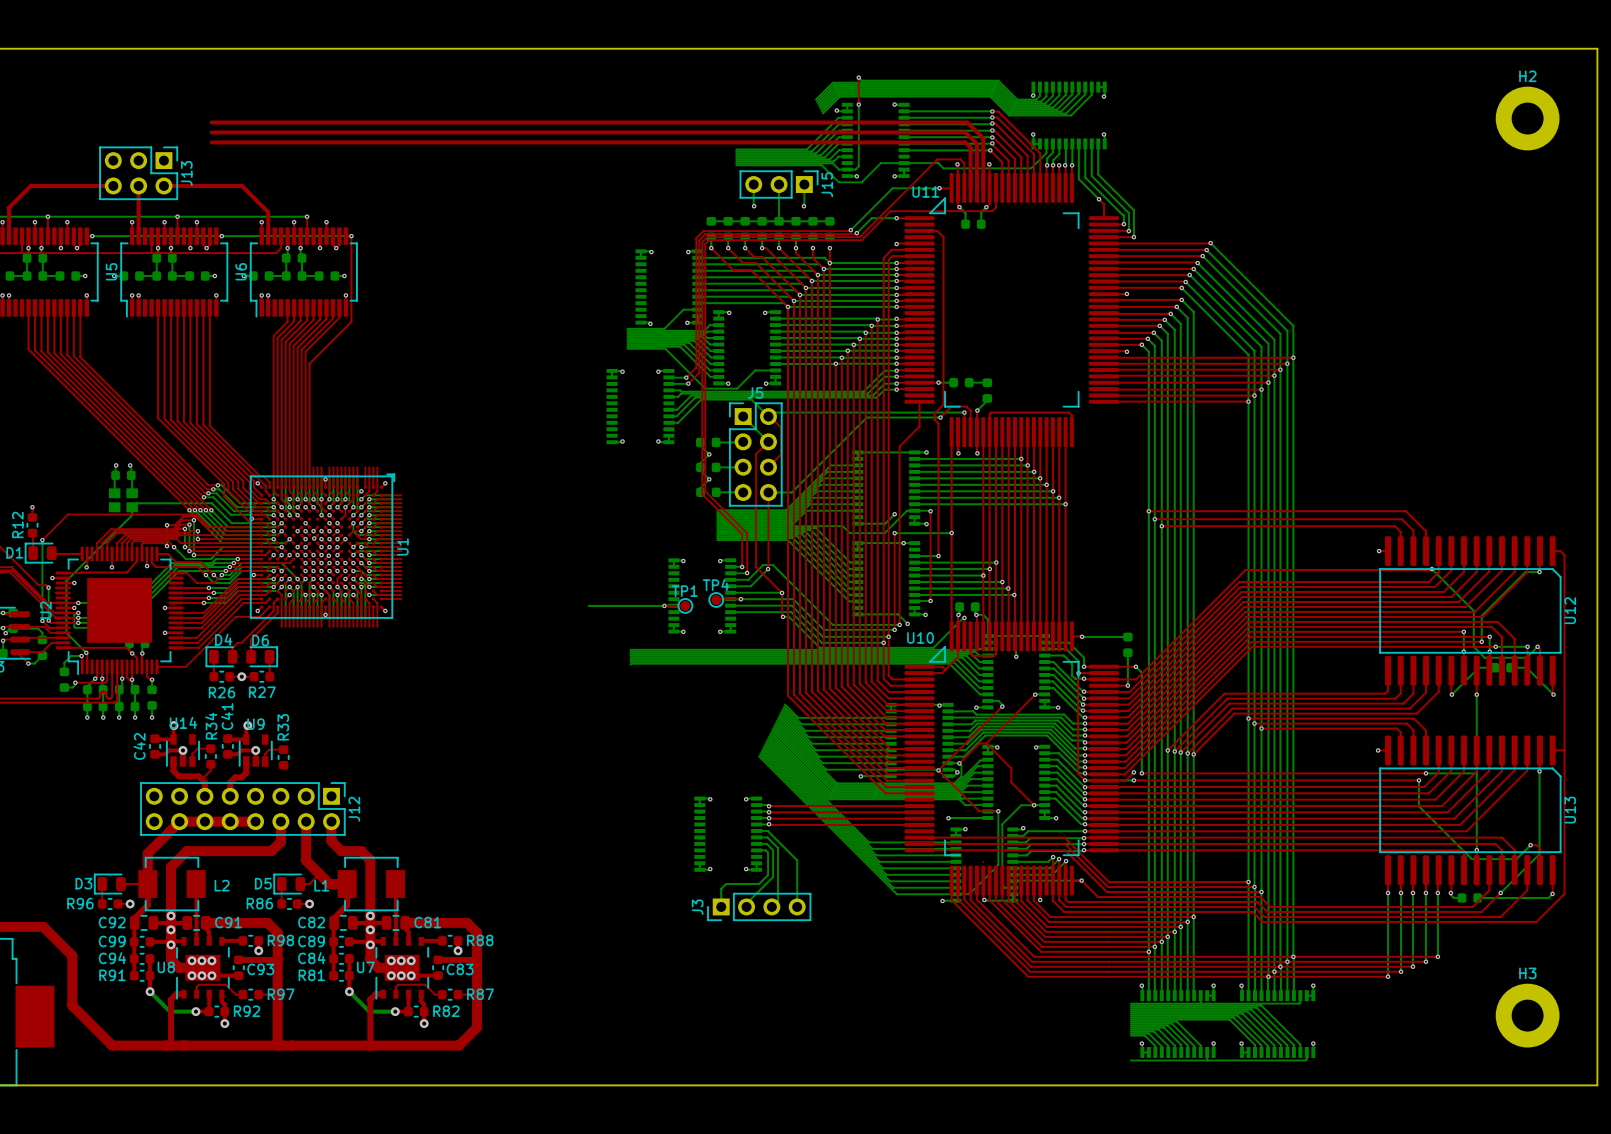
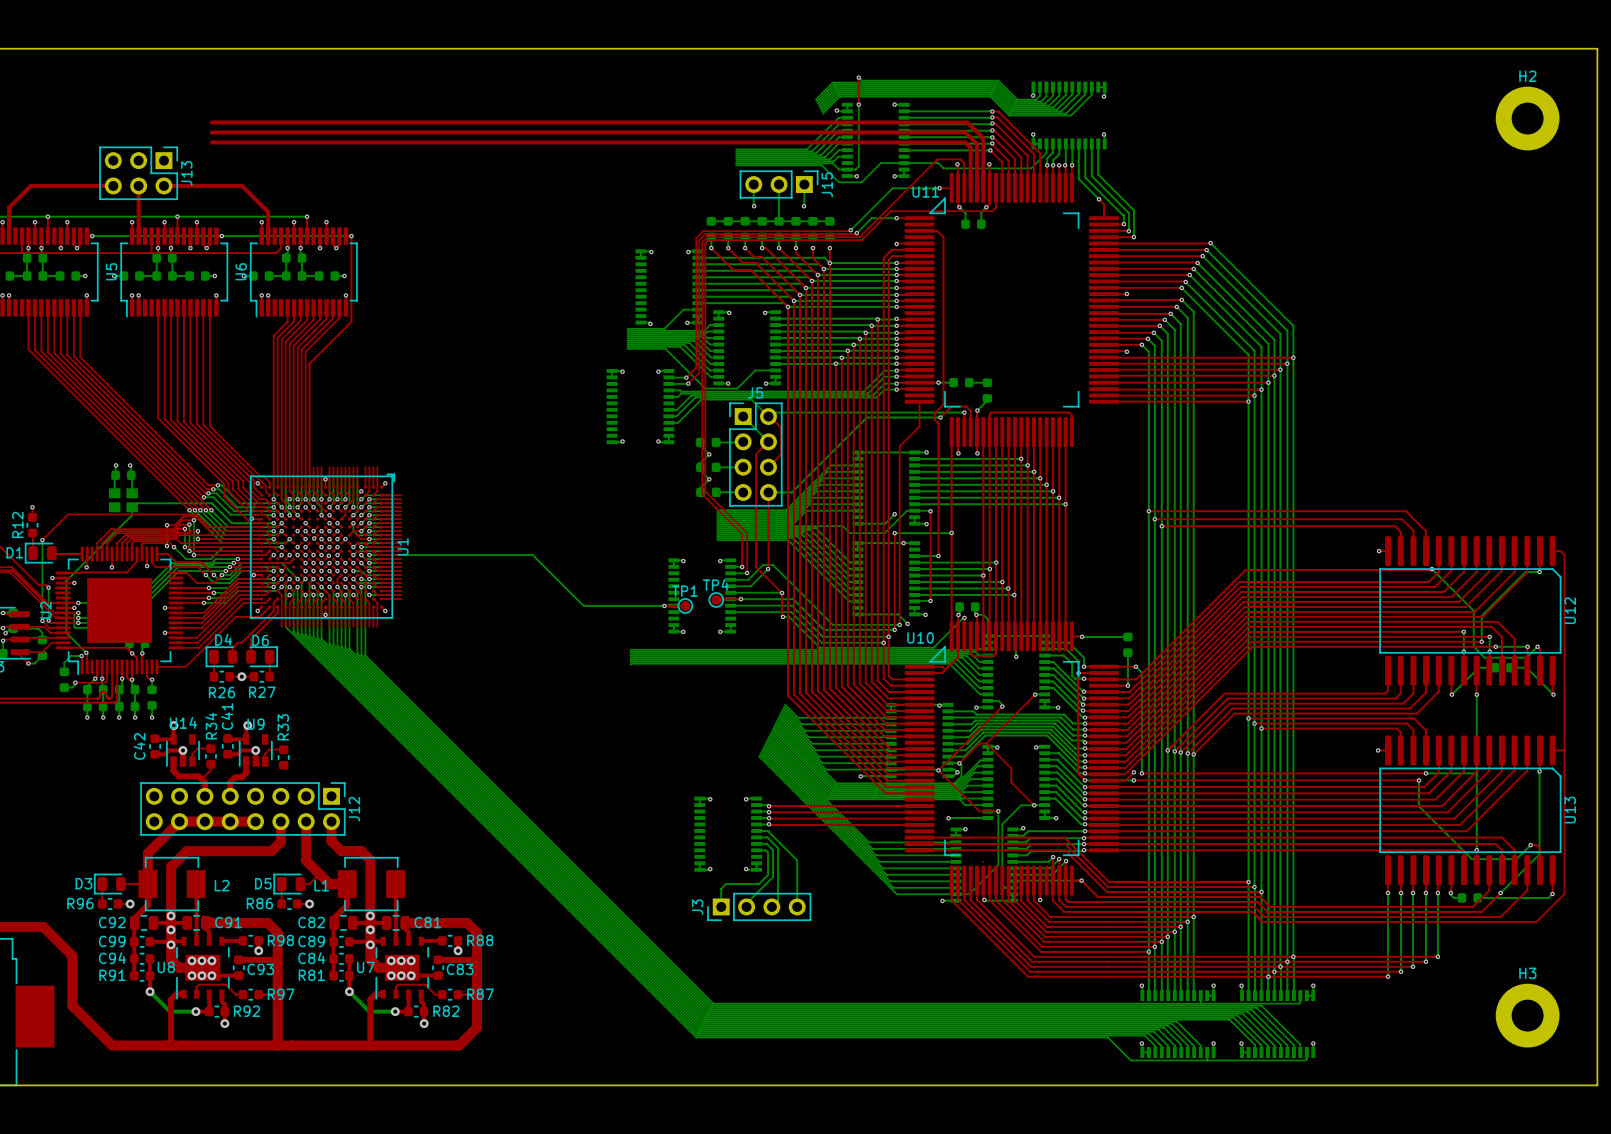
bottom track: none -> (393, 555) (532, 555) (583, 605) (588, 605)
bottom track: none -> (285, 618) (285, 626) (696, 1037) (1107, 1037) (1130, 1060)
bottom track: none -> (293, 618) (293, 631) (697, 1035) (1130, 1035)
bottom track: none -> (297, 618) (297, 632) (698, 1033) (1130, 1033)
bottom track: none -> (301, 618) (301, 633) (699, 1031) (1130, 1031)
bottom track: none -> (305, 618) (305, 634) (700, 1029) (1130, 1029)
bottom track: none -> (309, 618) (309, 635) (701, 1027) (1130, 1027)
bottom track: none -> (313, 618) (313, 636) (702, 1025) (1130, 1025)
bottom track: none -> (317, 618) (317, 637) (703, 1023) (1130, 1023)
bottom track: none -> (321, 618) (321, 638) (704, 1021) (1130, 1021)
bottom track: none -> (329, 618) (329, 643) (705, 1019) (1130, 1019)
bottom track: none -> (333, 618) (333, 644) (706, 1017) (1130, 1017)
bottom track: none -> (337, 618) (337, 645) (707, 1015) (1130, 1015)
bottom track: none -> (341, 618) (341, 646) (708, 1013) (1130, 1013)
bottom track: none -> (345, 618) (345, 647) (709, 1011) (1130, 1011)
bottom track: none -> (349, 618) (349, 648) (710, 1009) (1130, 1009)
bottom track: none -> (357, 618) (357, 653) (711, 1007) (1130, 1007)
bottom track: none -> (361, 618) (361, 654) (712, 1005) (1130, 1005)
bottom track: none -> (365, 618) (365, 655) (713, 1003) (1130, 1003)

